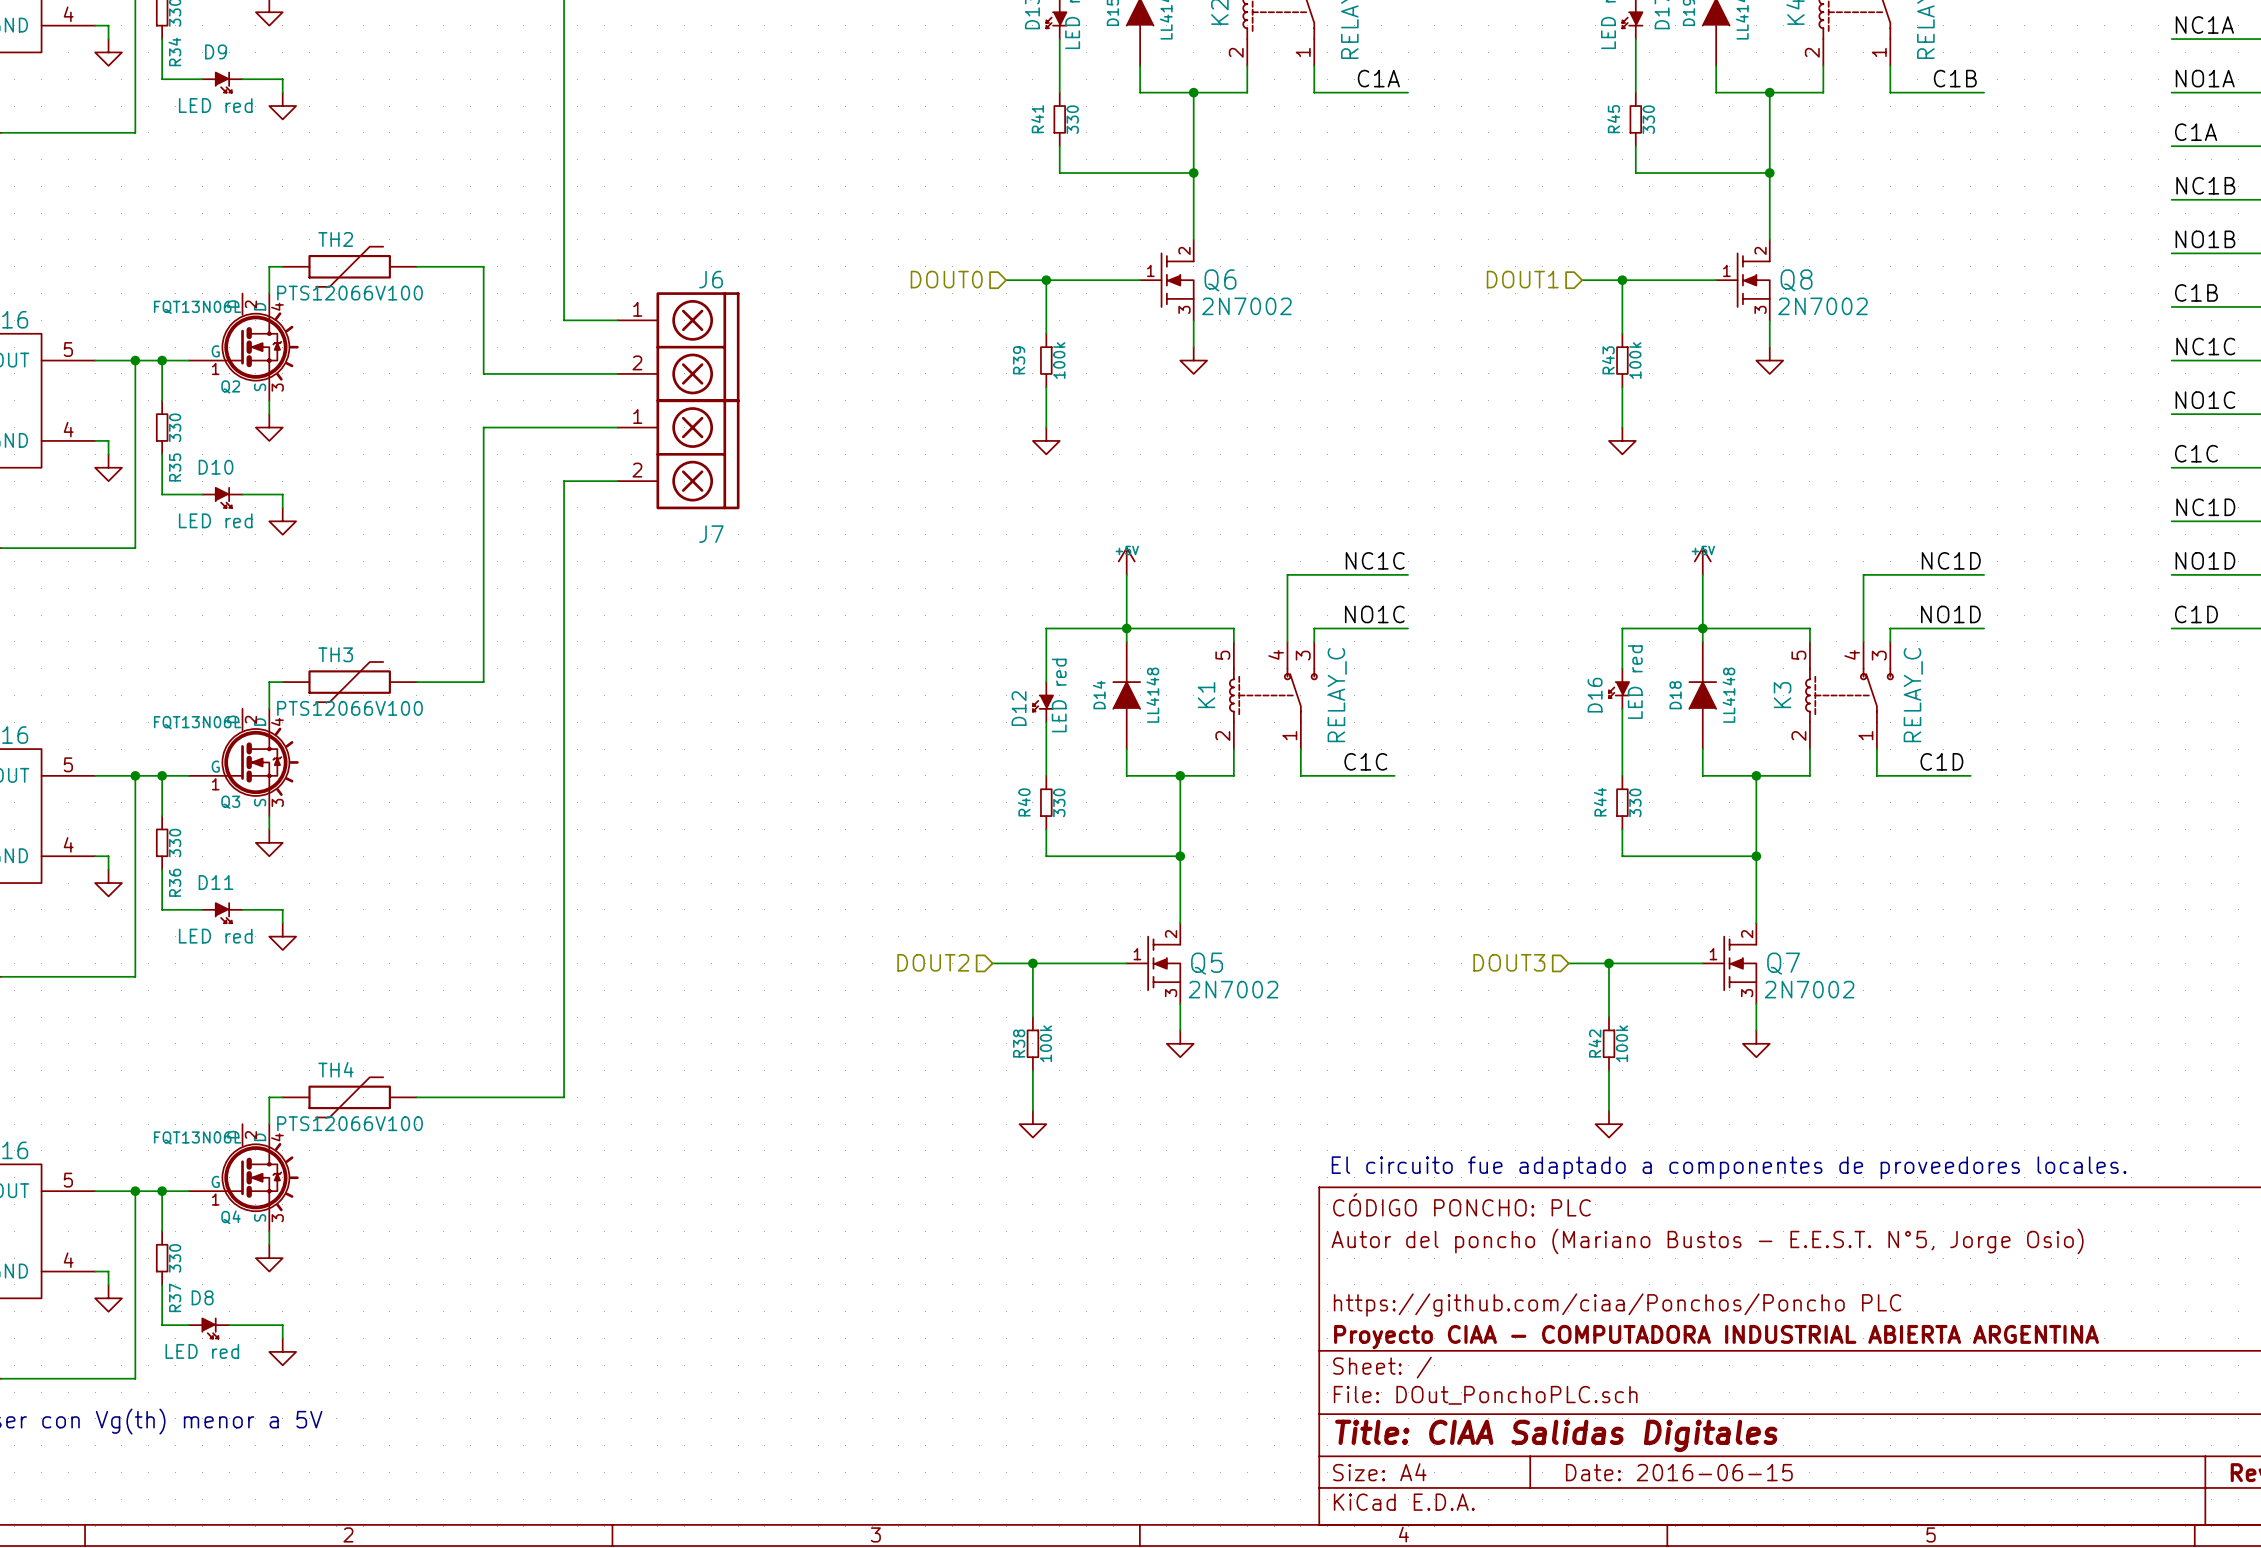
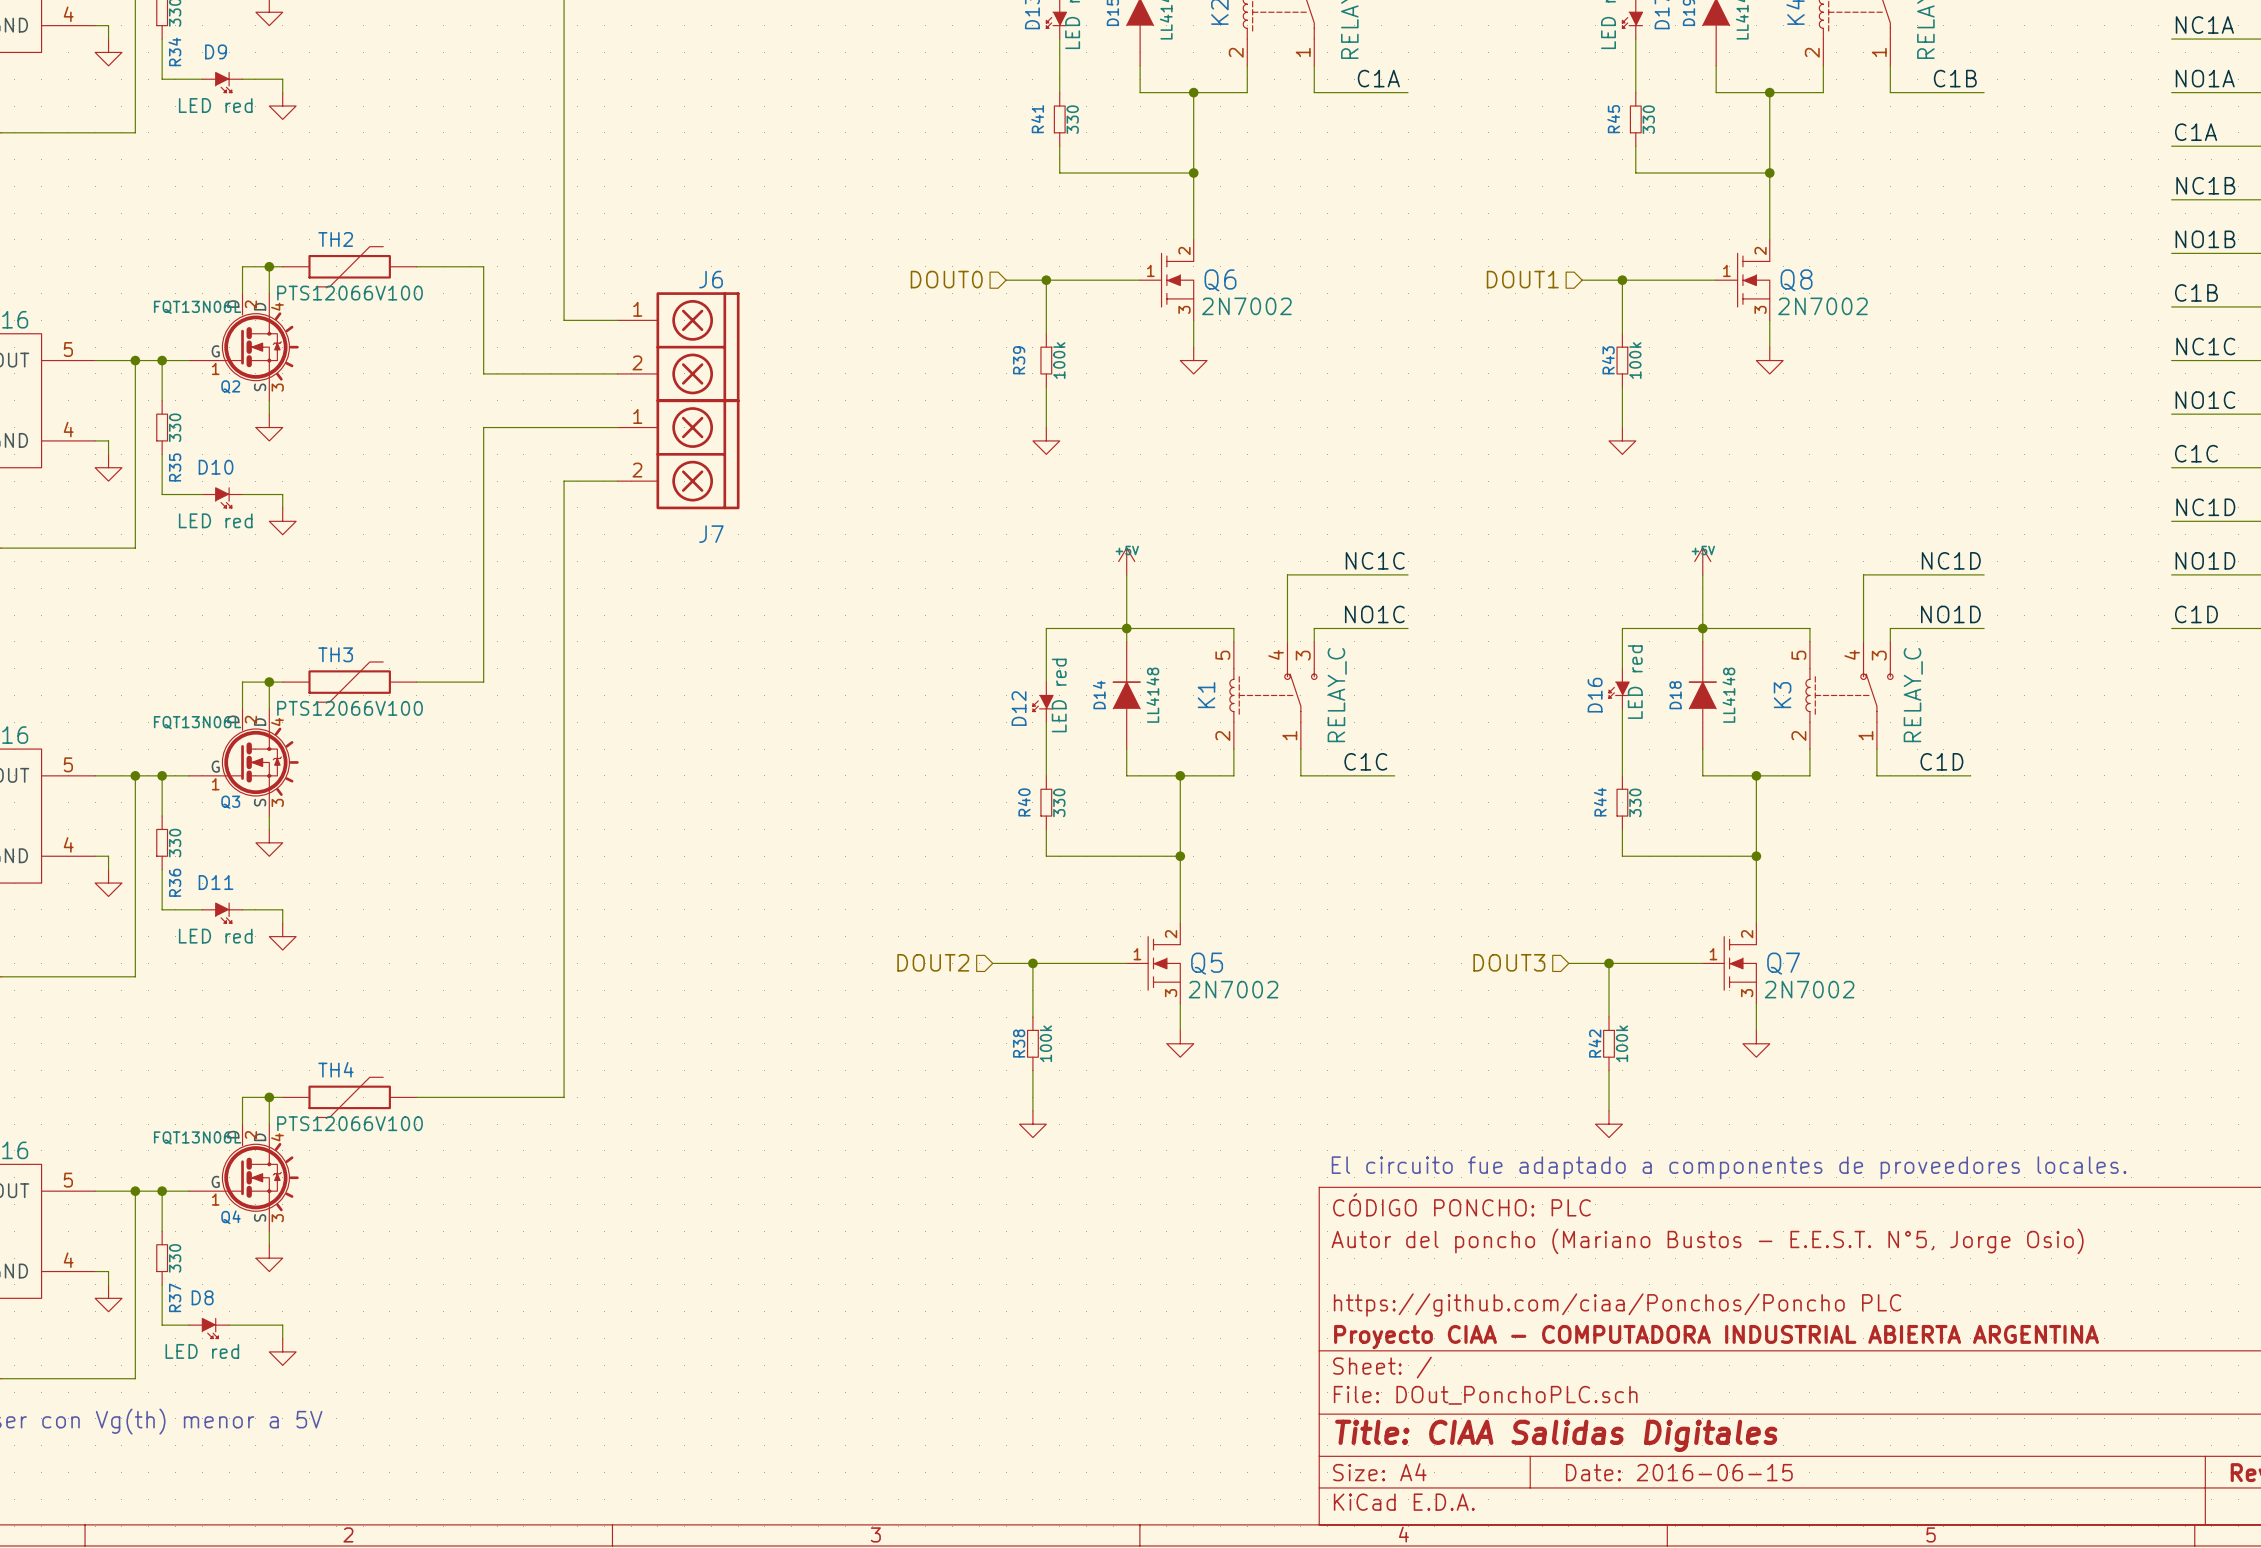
wire: none -> (269, 266) (242, 266) (242, 293)
junction: none -> (269, 266)
wire: none -> (269, 682) (242, 682) (242, 708)
junction: none -> (269, 682)
wire: none -> (269, 1097) (242, 1097) (242, 1124)
junction: none -> (269, 1097)

